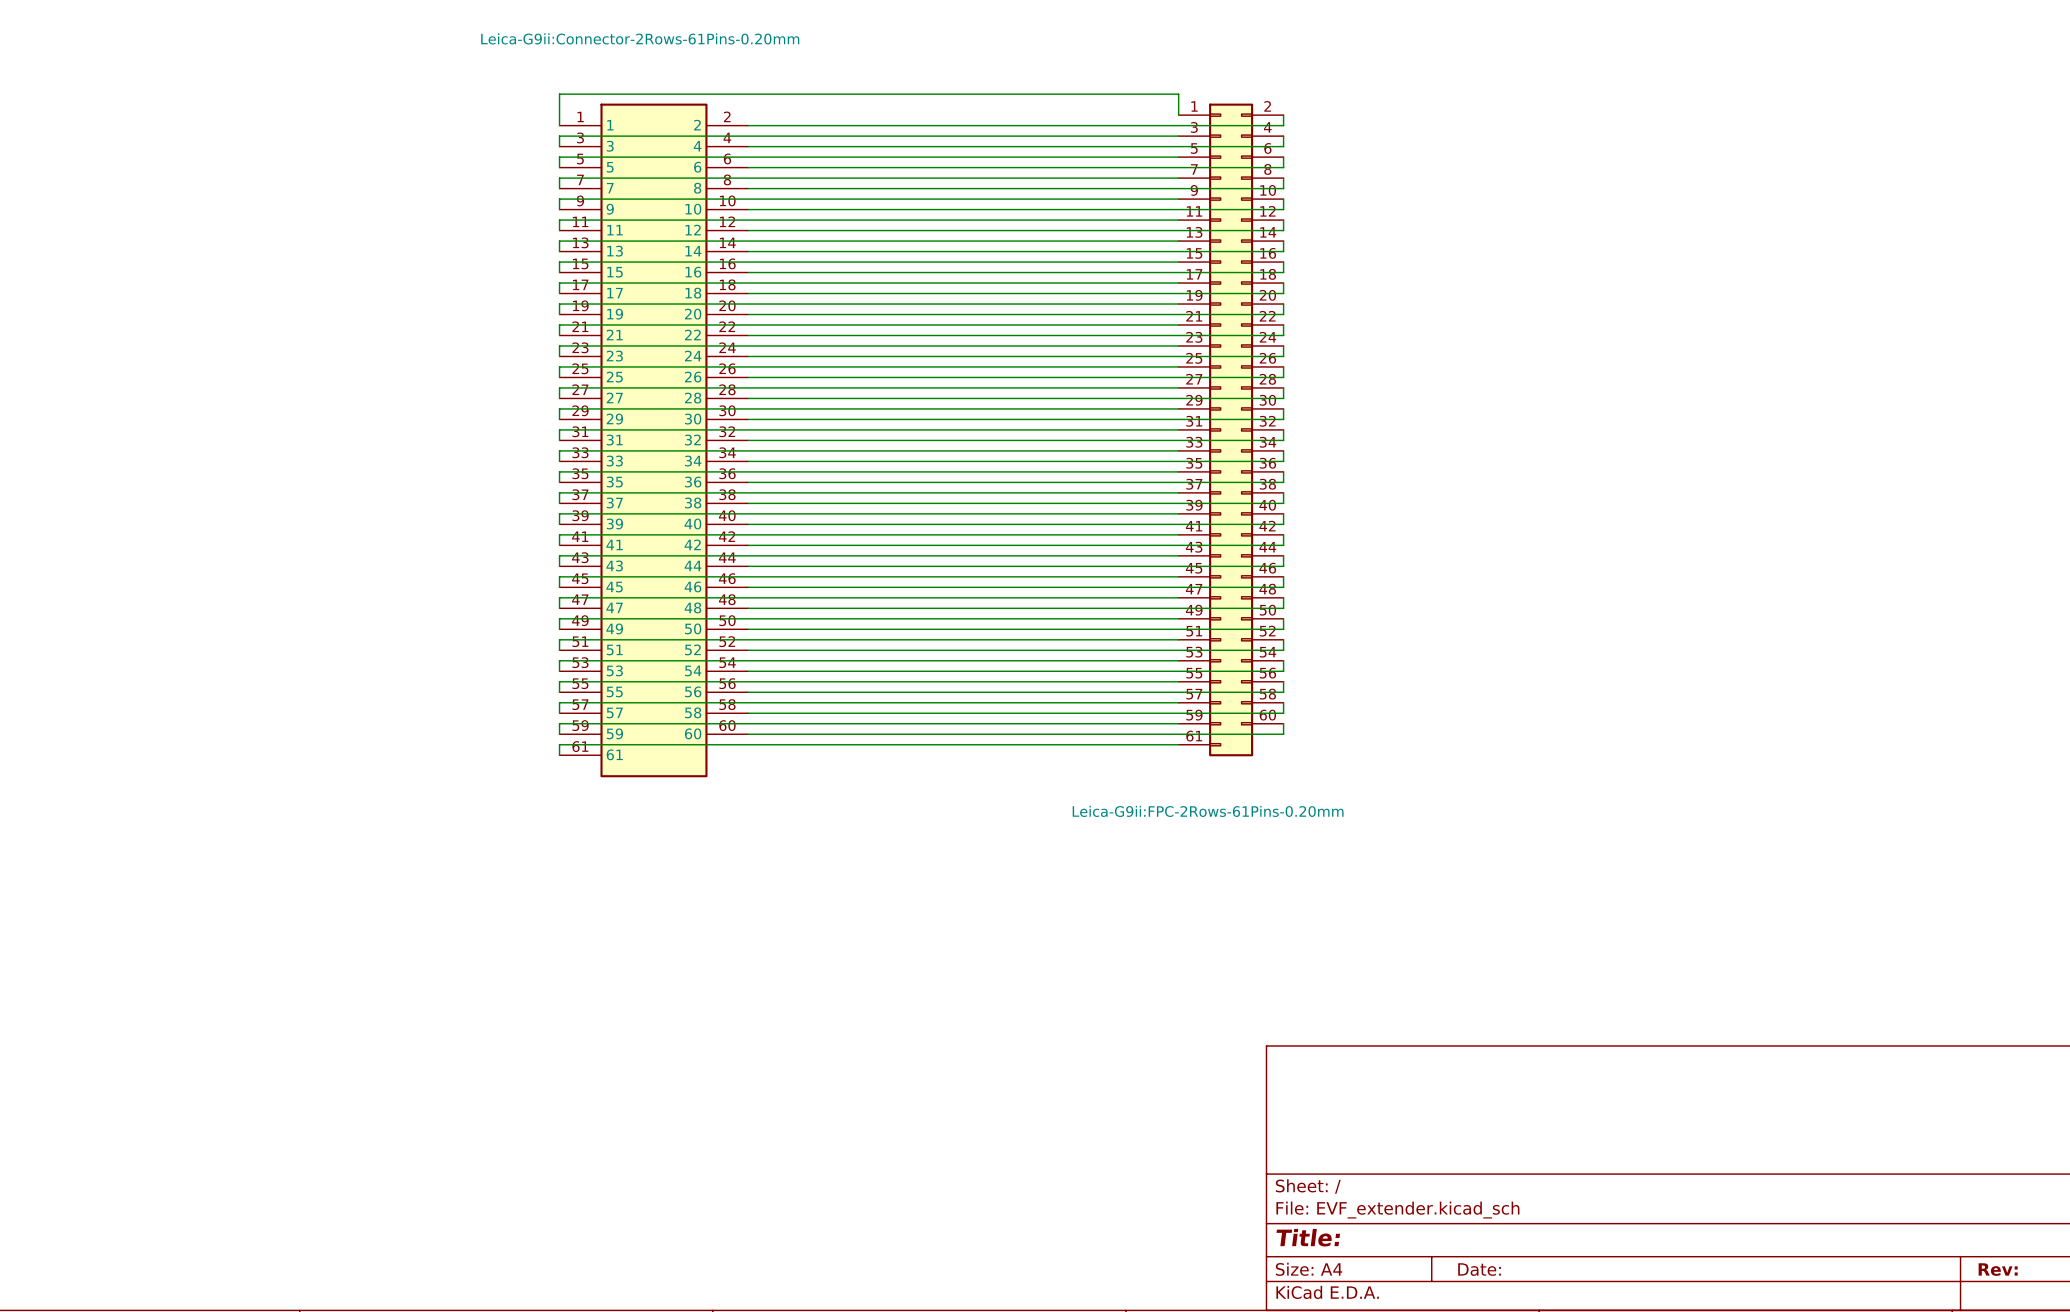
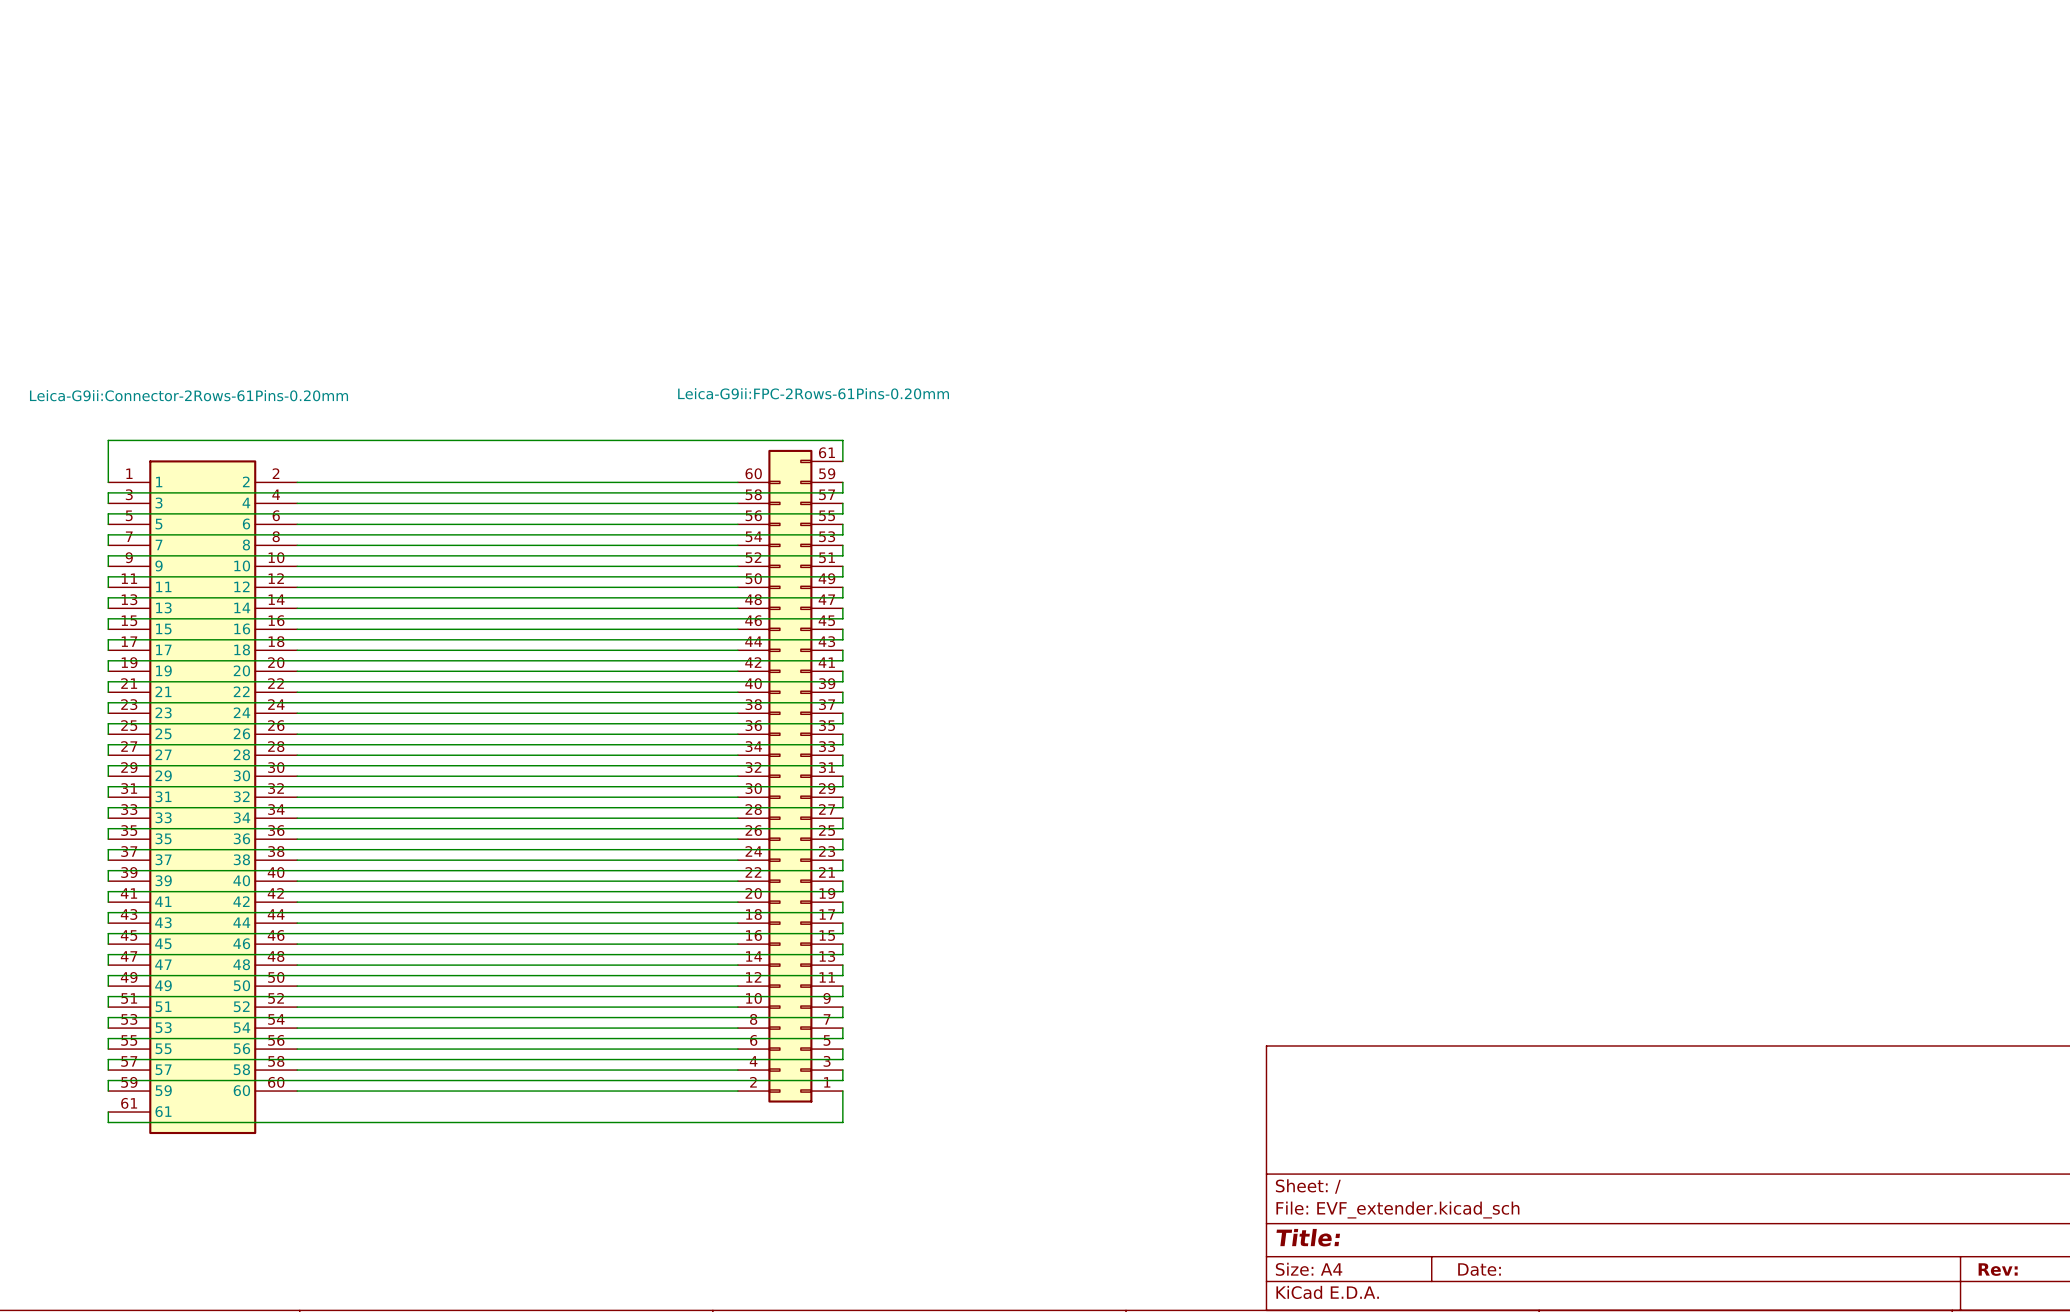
wire: (1178, 115) (1178, 94) (559, 94) (559, 125) -> none
wire: (1283, 115) (1283, 125) (748, 125) -> none
wire: (1178, 136) (559, 136) (559, 146) -> none
wire: (1283, 136) (1283, 146) (748, 146) -> none
wire: (1178, 157) (559, 157) (559, 167) -> none
wire: (1283, 157) (1283, 167) (748, 167) -> none
wire: (1178, 178) (559, 178) (559, 188) -> none
wire: (1283, 178) (1283, 188) (748, 188) -> none
wire: (1178, 199) (559, 199) (559, 209) -> none
wire: (1283, 199) (1283, 209) (748, 209) -> none
wire: (1178, 220) (559, 220) (559, 230) -> none
wire: (1283, 220) (1283, 230) (748, 230) -> none
wire: (1178, 241) (559, 241) (559, 251) -> none
wire: (1283, 241) (1283, 251) (748, 251) -> none
wire: (1178, 262) (559, 262) (559, 272) -> none
wire: (1283, 262) (1283, 272) (748, 272) -> none
wire: (1178, 283) (559, 283) (559, 293) -> none
wire: (1283, 283) (1283, 293) (748, 293) -> none
wire: (1178, 304) (559, 304) (559, 314) -> none
wire: (1283, 304) (1283, 314) (748, 314) -> none
wire: (1178, 325) (559, 325) (559, 335) -> none
wire: (1283, 325) (1283, 335) (748, 335) -> none
wire: (1178, 345) (559, 345) (559, 356) -> none
wire: (1283, 345) (1283, 356) (748, 356) -> none
wire: (1178, 366) (559, 366) (559, 377) -> none
wire: (1283, 366) (1283, 377) (748, 377) -> none
wire: (1178, 387) (559, 387) (559, 398) -> none
wire: (1283, 387) (1283, 398) (748, 398) -> none
wire: (1178, 408) (559, 408) (559, 419) -> none
wire: (1283, 408) (1283, 419) (748, 419) -> none
wire: (1178, 429) (559, 429) (559, 440) -> none
part: (1231, 429) -> none
wire: (1283, 429) (1283, 440) (842, 440) -> (842, 461) (842, 440)
part: (653, 440) -> none
wire: none -> (748, 440) (108, 440) (108, 482)
wire: (1178, 450) (559, 450) (559, 461) -> none
wire: (1283, 450) (1283, 461) (748, 461) -> none
wire: (1178, 471) (559, 471) (559, 482) -> none
wire: (1283, 471) (1283, 482) (748, 482) -> none
wire: none -> (297, 482) (737, 482)
wire: (559, 492) (559, 503) -> (559, 492) (108, 492) (108, 503)
wire: (842, 492) (1178, 492) -> (842, 492) (842, 482)
wire: (1283, 492) (1283, 503) (748, 503) -> none
wire: none -> (297, 503) (737, 503)
wire: (559, 513) (559, 524) -> (559, 513) (108, 513) (108, 524)
wire: (842, 513) (1178, 513) -> (842, 513) (842, 503)
wire: (1283, 513) (1283, 524) (748, 524) -> none
wire: none -> (297, 524) (737, 524)
wire: (559, 534) (559, 545) -> (559, 534) (108, 534) (108, 545)
wire: (842, 534) (1178, 534) -> (842, 534) (842, 524)
wire: (1283, 534) (1283, 545) (748, 545) -> none
wire: none -> (297, 545) (737, 545)
wire: (559, 555) (559, 566) -> (559, 555) (108, 555) (108, 566)
wire: (842, 555) (1178, 555) -> (842, 555) (842, 545)
wire: (1283, 555) (1283, 566) (748, 566) -> none
wire: none -> (297, 566) (737, 566)
wire: (559, 576) (559, 587) -> (559, 576) (108, 576) (108, 587)
wire: (842, 576) (1178, 576) -> (842, 576) (842, 566)
wire: (1283, 576) (1283, 587) (748, 587) -> none
wire: none -> (297, 587) (737, 587)
wire: (559, 597) (559, 608) -> (559, 597) (108, 597) (108, 608)
wire: (842, 597) (1178, 597) -> (842, 597) (842, 587)
wire: (1283, 597) (1283, 608) (748, 608) -> none
wire: none -> (297, 608) (737, 608)
wire: (559, 618) (559, 629) -> (559, 618) (108, 618) (108, 629)
wire: (842, 618) (1178, 618) -> (842, 618) (842, 608)
wire: (1283, 618) (1283, 629) (748, 629) -> none
wire: none -> (297, 629) (737, 629)
wire: (559, 639) (559, 650) -> (559, 639) (108, 639) (108, 650)
wire: (842, 639) (1178, 639) -> (842, 639) (842, 629)
wire: (1283, 639) (1283, 650) (748, 650) -> none
wire: none -> (297, 650) (737, 650)
wire: (559, 660) (559, 671) -> (559, 660) (108, 660) (108, 671)
wire: (842, 660) (1178, 660) -> (842, 660) (842, 650)
wire: (1283, 660) (1283, 671) (748, 671) -> none
wire: none -> (297, 671) (737, 671)
wire: (559, 681) (559, 692) -> (559, 681) (108, 681) (108, 692)
wire: (842, 681) (1178, 681) -> (842, 681) (842, 671)
wire: (1283, 681) (1283, 692) (748, 692) -> none
wire: none -> (297, 692) (737, 692)
wire: (559, 702) (559, 713) -> (559, 702) (108, 702) (108, 713)
wire: (842, 702) (1178, 702) -> (842, 702) (842, 692)
wire: (1283, 702) (1283, 713) (748, 713) -> none
wire: none -> (297, 713) (737, 713)
wire: (559, 723) (559, 734) -> (559, 723) (108, 723) (108, 734)
wire: (842, 723) (1178, 723) -> (842, 723) (842, 713)
wire: (1283, 723) (1283, 734) (748, 734) -> none
wire: none -> (297, 734) (737, 734)
wire: (559, 744) (559, 755) -> (559, 744) (108, 744) (108, 755)
wire: (842, 744) (1178, 744) -> (842, 744) (842, 734)
wire: none -> (297, 755) (737, 755)
wire: none -> (842, 755) (842, 765) (108, 765) (108, 776)
wire: none -> (297, 776) (737, 776)
part: none -> (790, 776)
wire: none -> (842, 776) (842, 786) (108, 786) (108, 797)
part: none -> (202, 797)
wire: none -> (297, 797) (737, 797)
wire: none -> (842, 797) (842, 807) (108, 807) (108, 818)
wire: none -> (297, 818) (737, 818)
wire: none -> (842, 818) (842, 828) (108, 828) (108, 839)
wire: none -> (297, 839) (737, 839)
wire: none -> (842, 839) (842, 849) (108, 849) (108, 860)
wire: none -> (297, 860) (737, 860)
wire: none -> (842, 860) (842, 870) (108, 870) (108, 881)
wire: none -> (297, 881) (737, 881)
wire: none -> (842, 881) (842, 891) (108, 891) (108, 902)
wire: none -> (297, 902) (737, 902)
wire: none -> (842, 902) (842, 912) (108, 912) (108, 923)
wire: none -> (297, 923) (737, 923)
wire: none -> (842, 923) (842, 933) (108, 933) (108, 944)
wire: none -> (297, 944) (737, 944)
wire: none -> (842, 944) (842, 954) (108, 954) (108, 965)
wire: none -> (297, 965) (737, 965)
wire: none -> (842, 965) (842, 975) (108, 975) (108, 986)
wire: none -> (297, 986) (737, 986)
wire: none -> (842, 986) (842, 996) (108, 996) (108, 1007)
wire: none -> (297, 1007) (737, 1007)
wire: none -> (842, 1007) (842, 1017) (108, 1017) (108, 1028)
wire: none -> (297, 1028) (737, 1028)
wire: none -> (842, 1028) (842, 1038) (108, 1038) (108, 1049)
wire: none -> (297, 1049) (737, 1049)
wire: none -> (842, 1049) (842, 1059) (108, 1059) (108, 1070)
wire: none -> (297, 1070) (737, 1070)
wire: none -> (842, 1070) (842, 1080) (108, 1080) (108, 1091)
wire: none -> (297, 1091) (737, 1091)
wire: none -> (842, 1091) (842, 1122) (108, 1122) (108, 1112)

